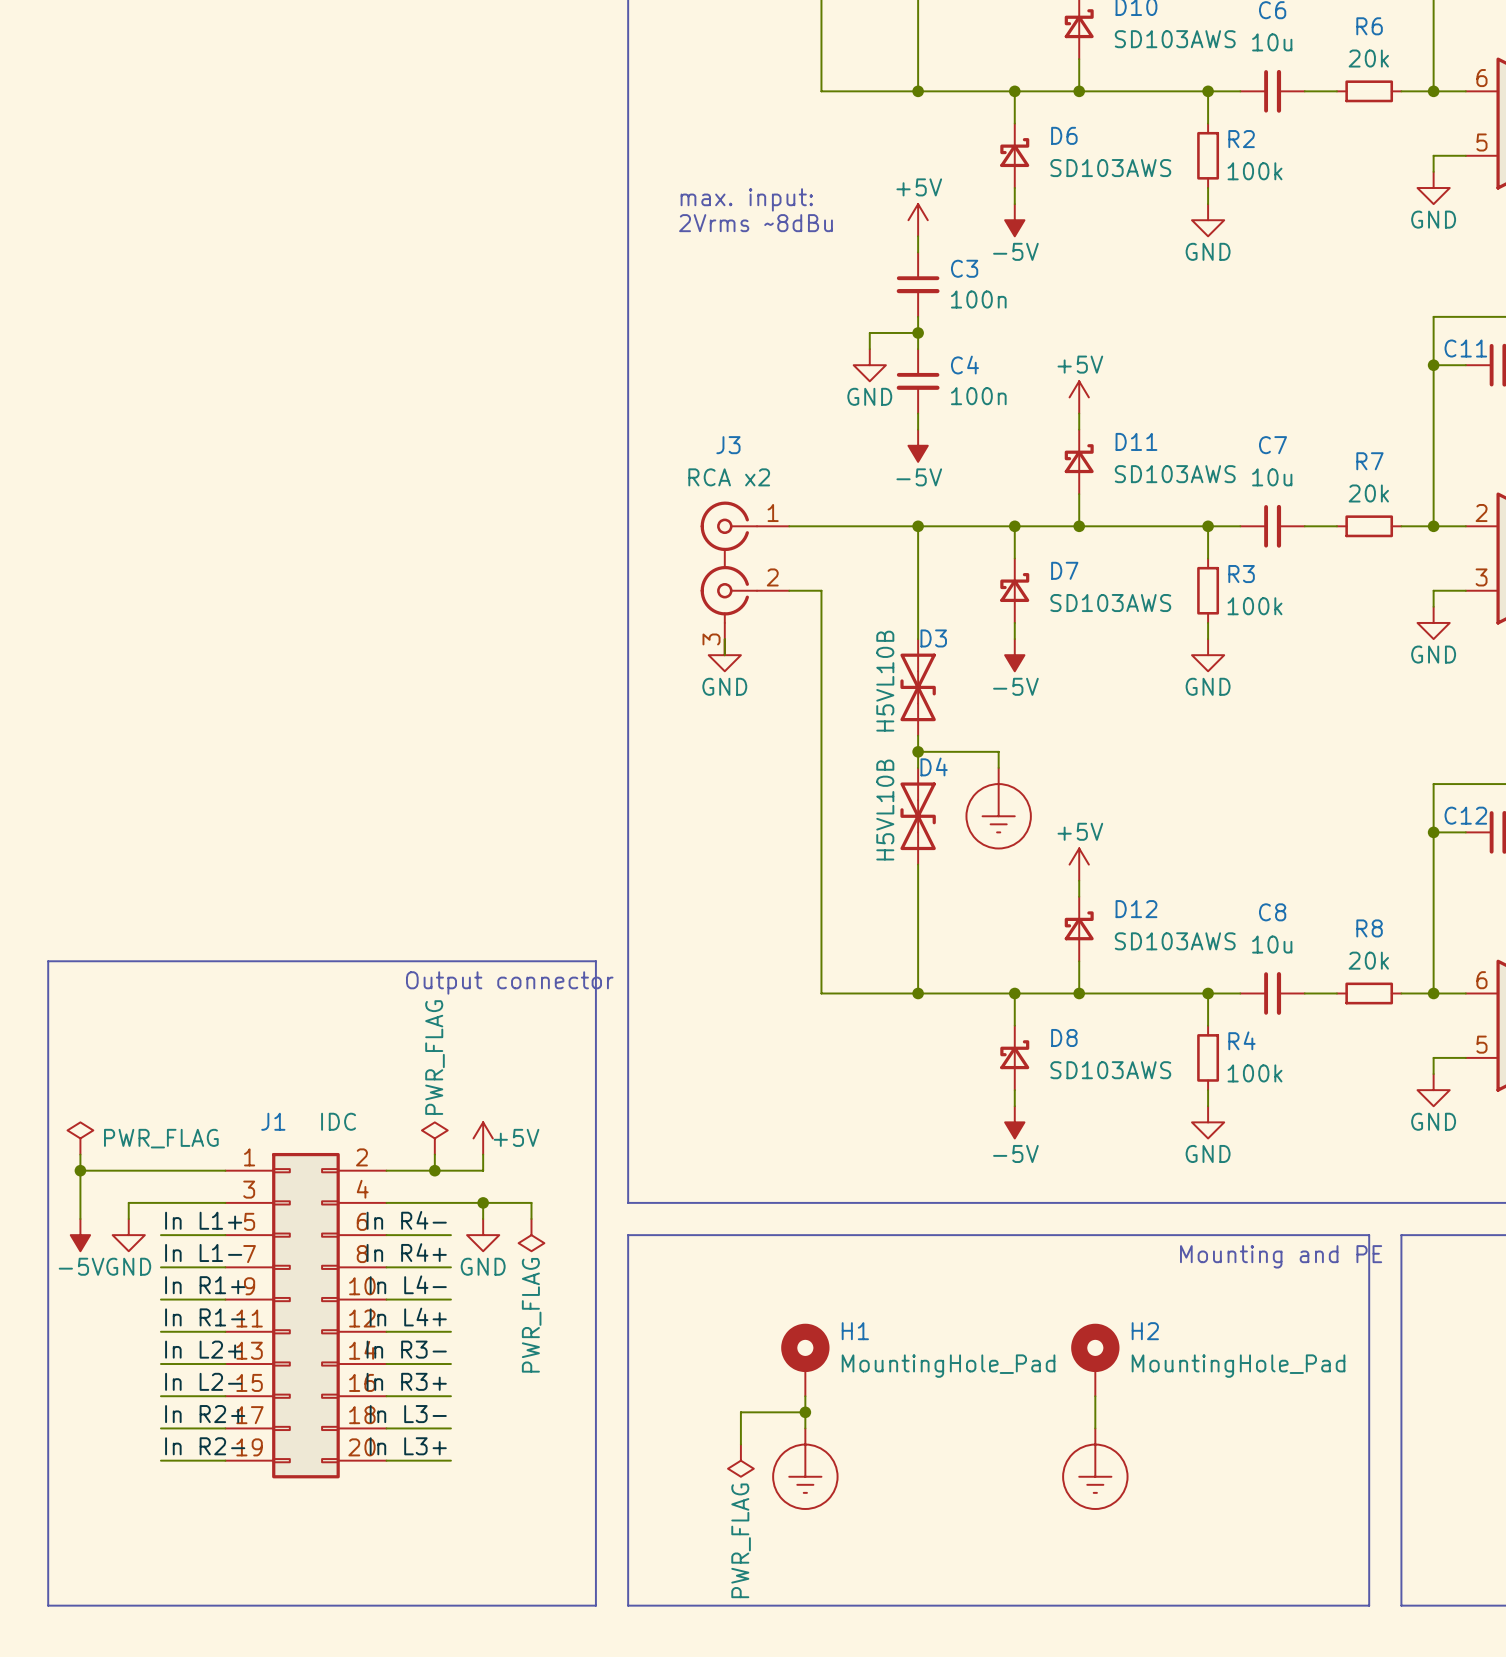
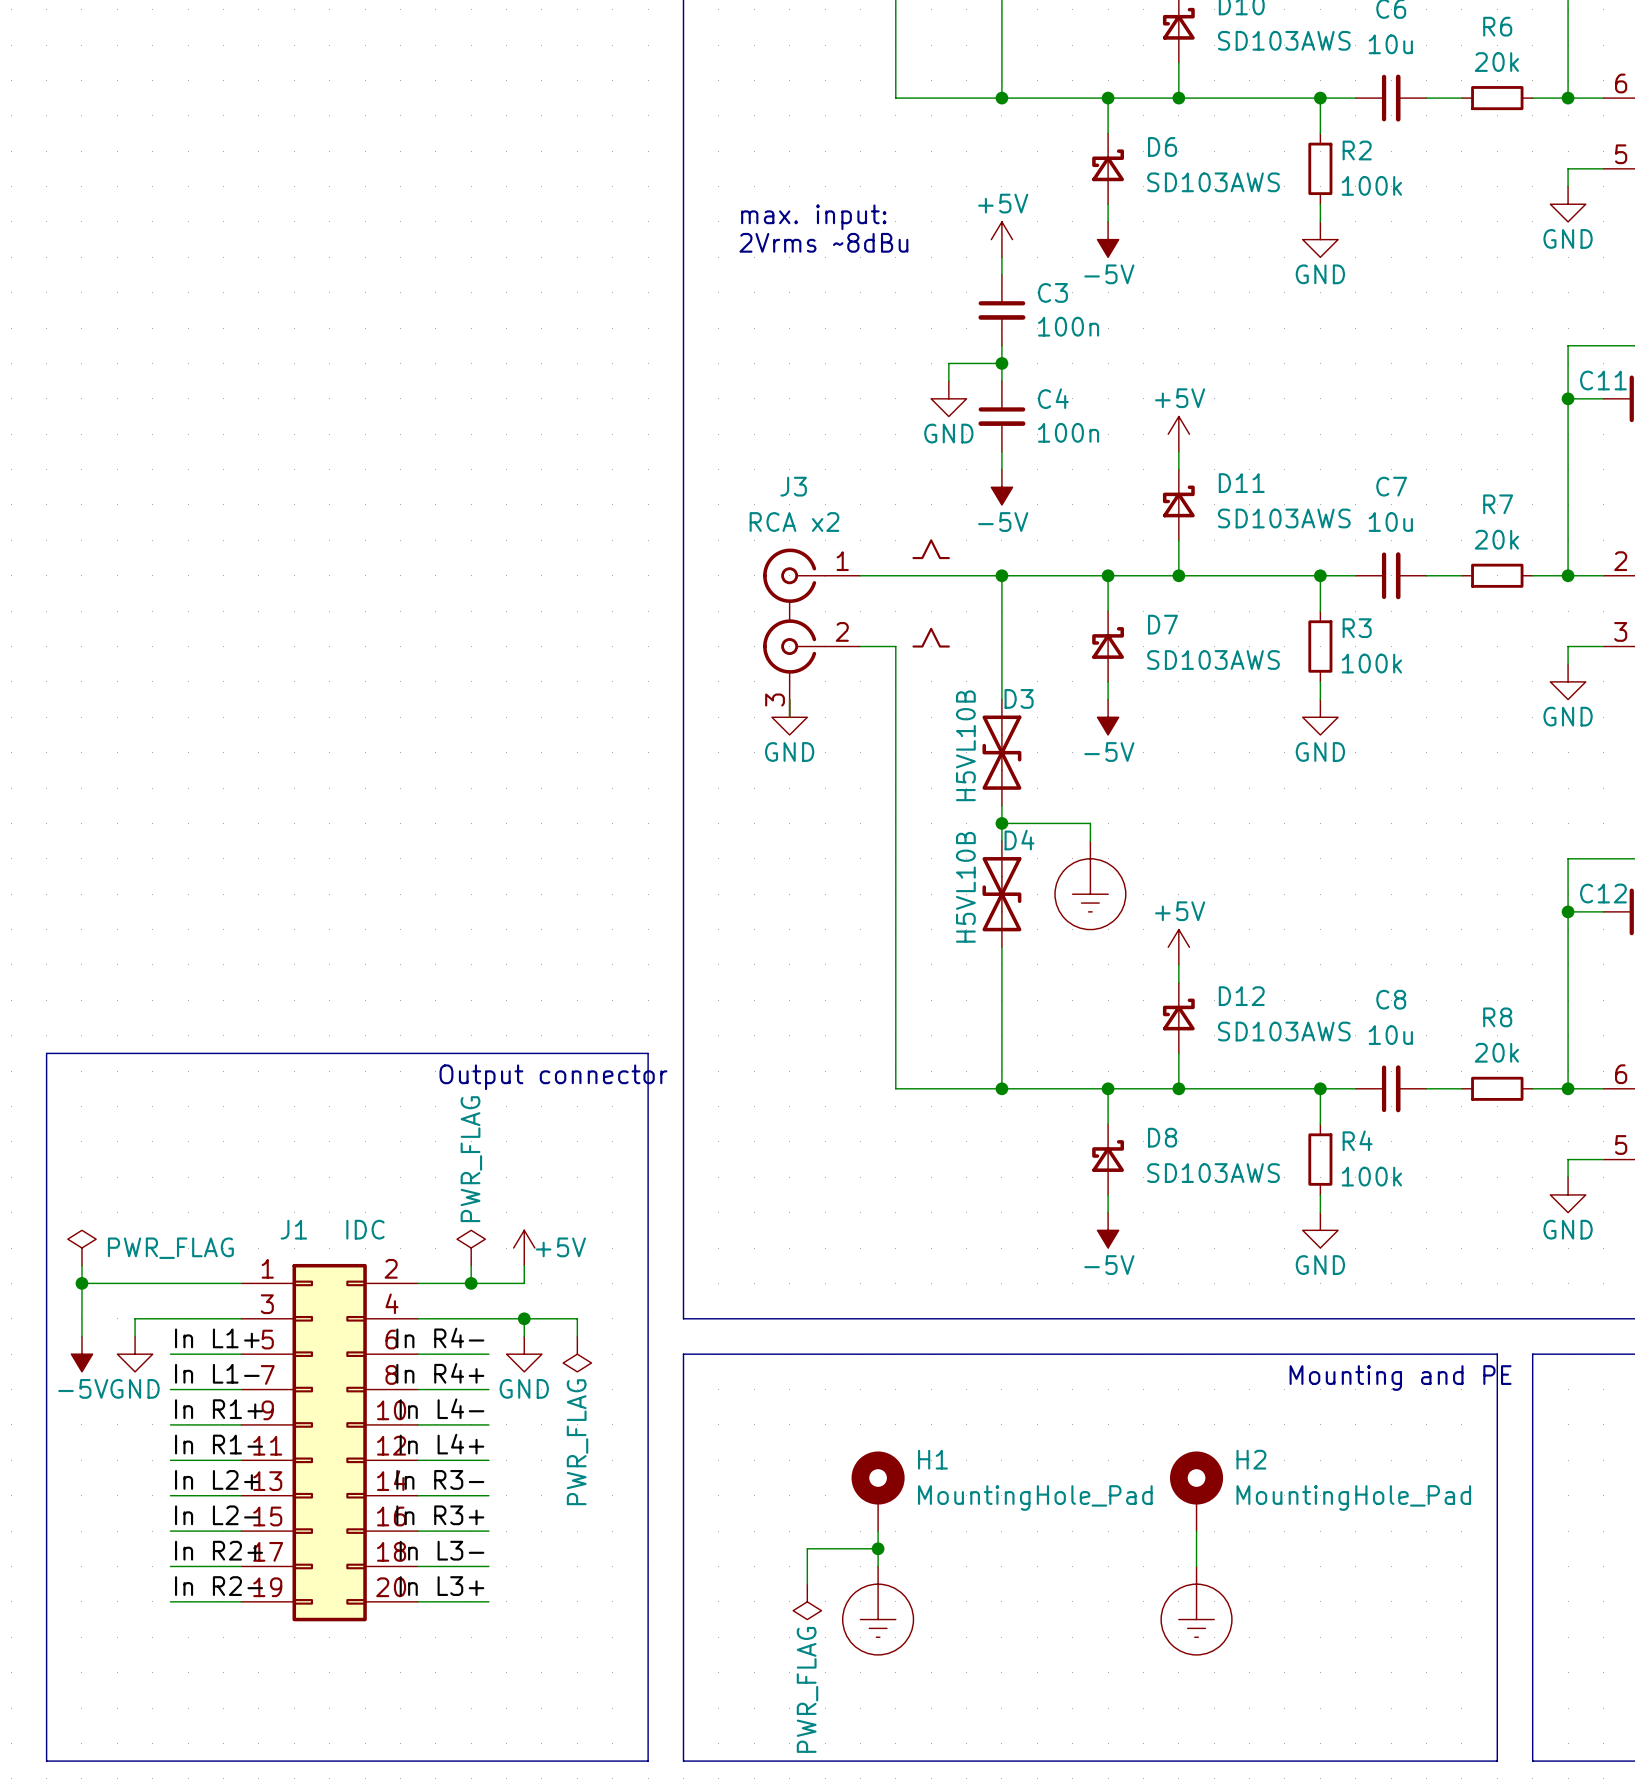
part: none -> (931, 549)
part: none -> (931, 637)

